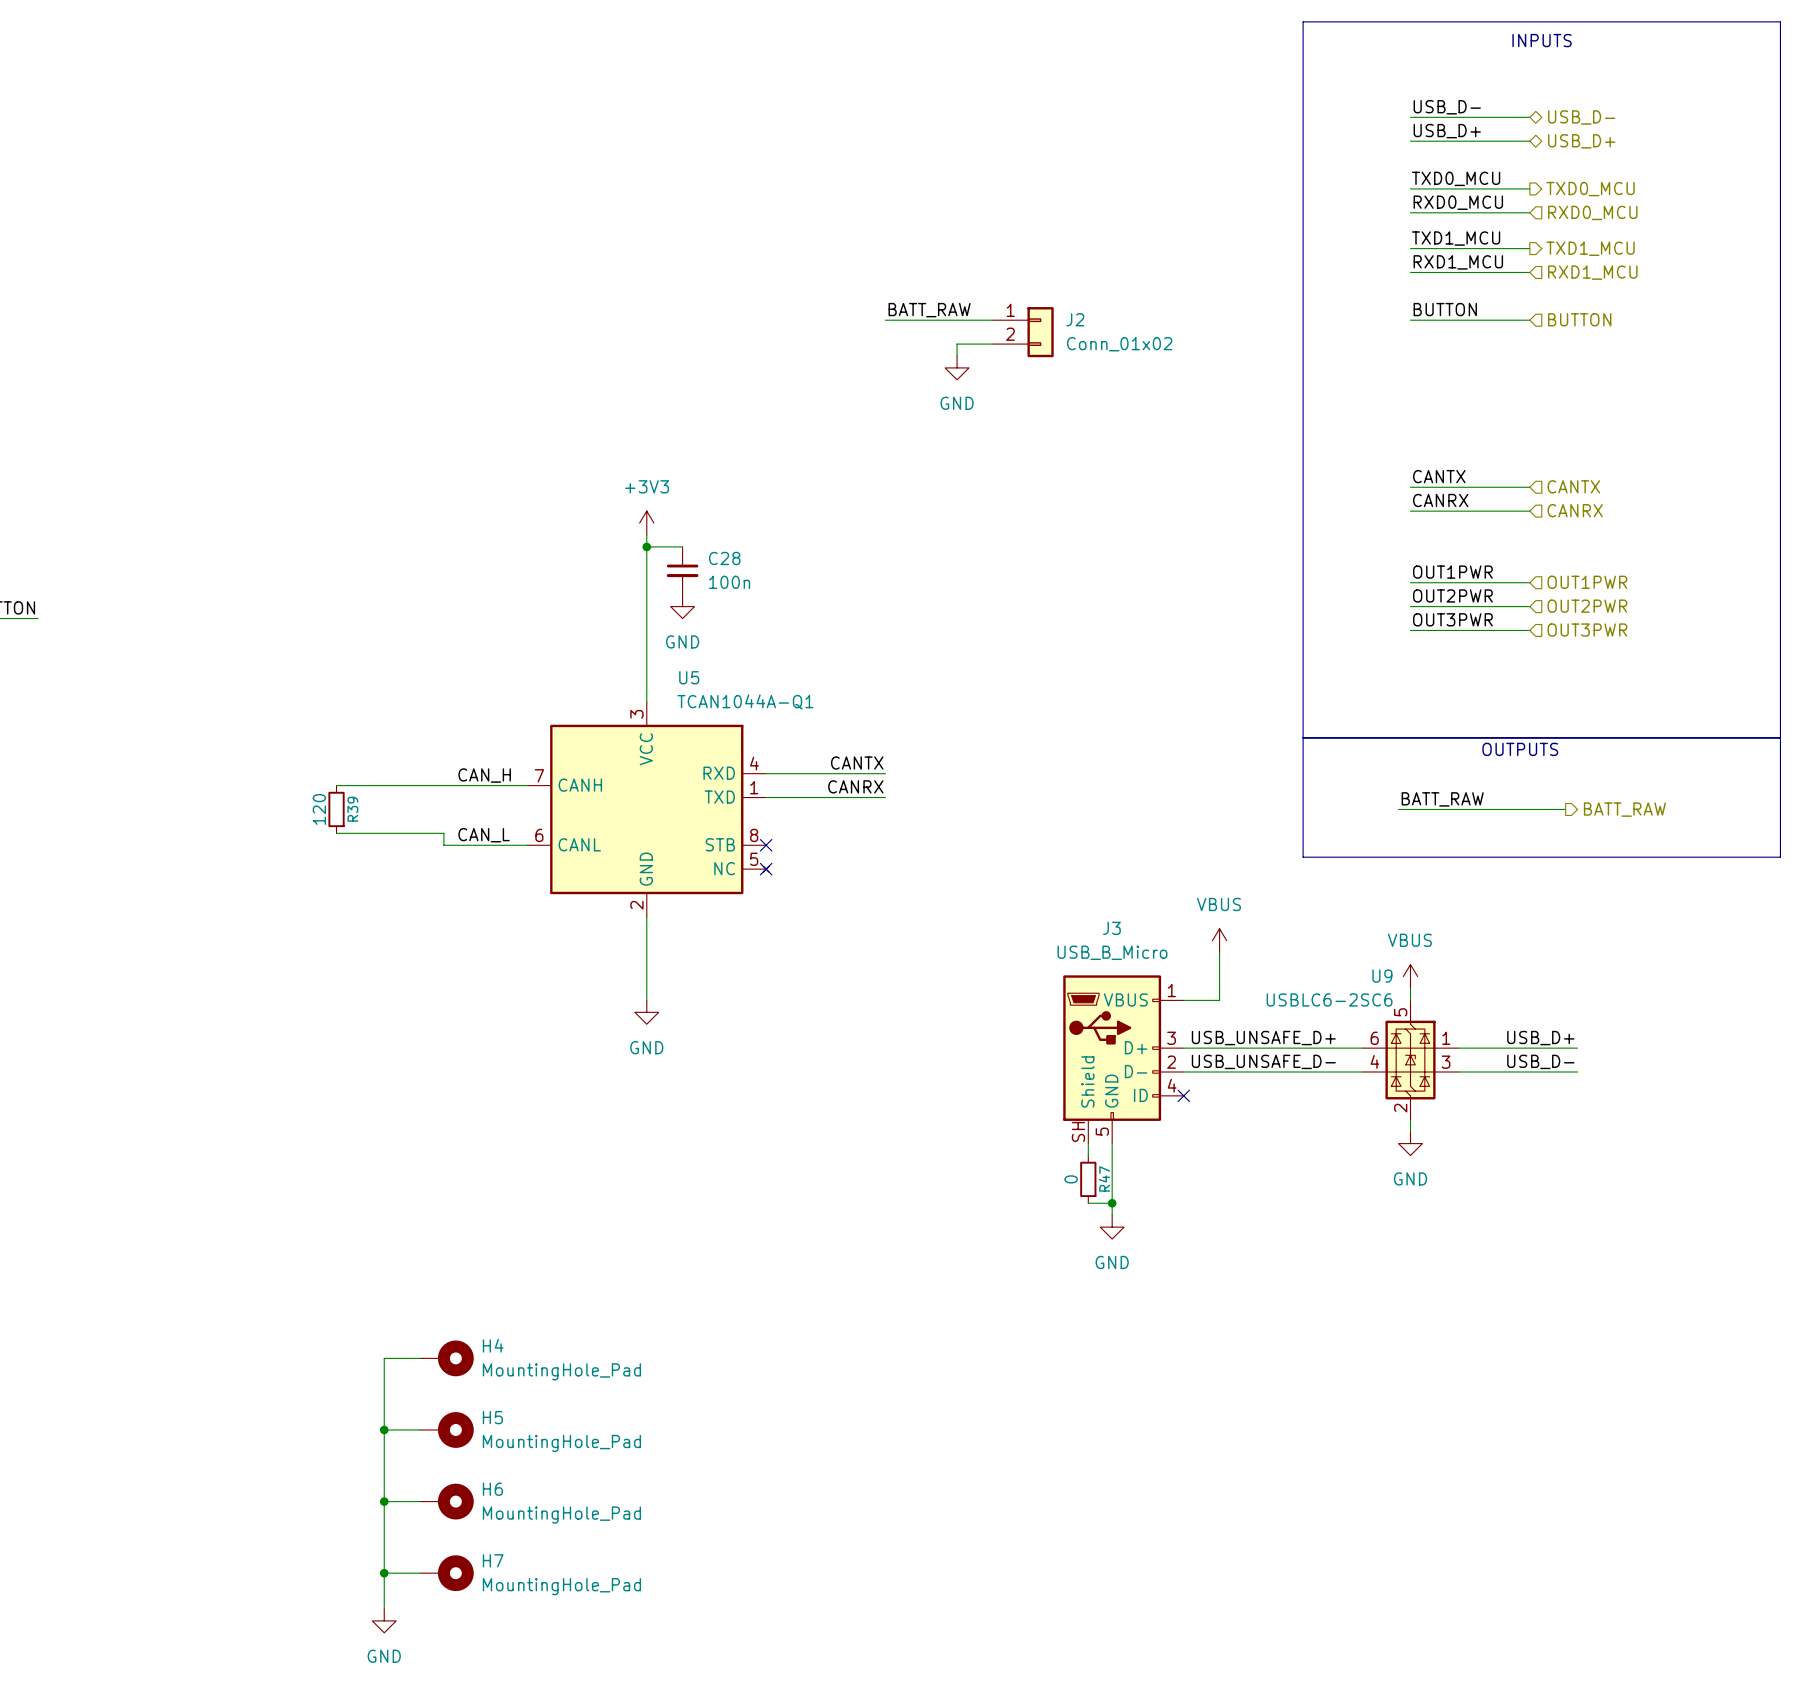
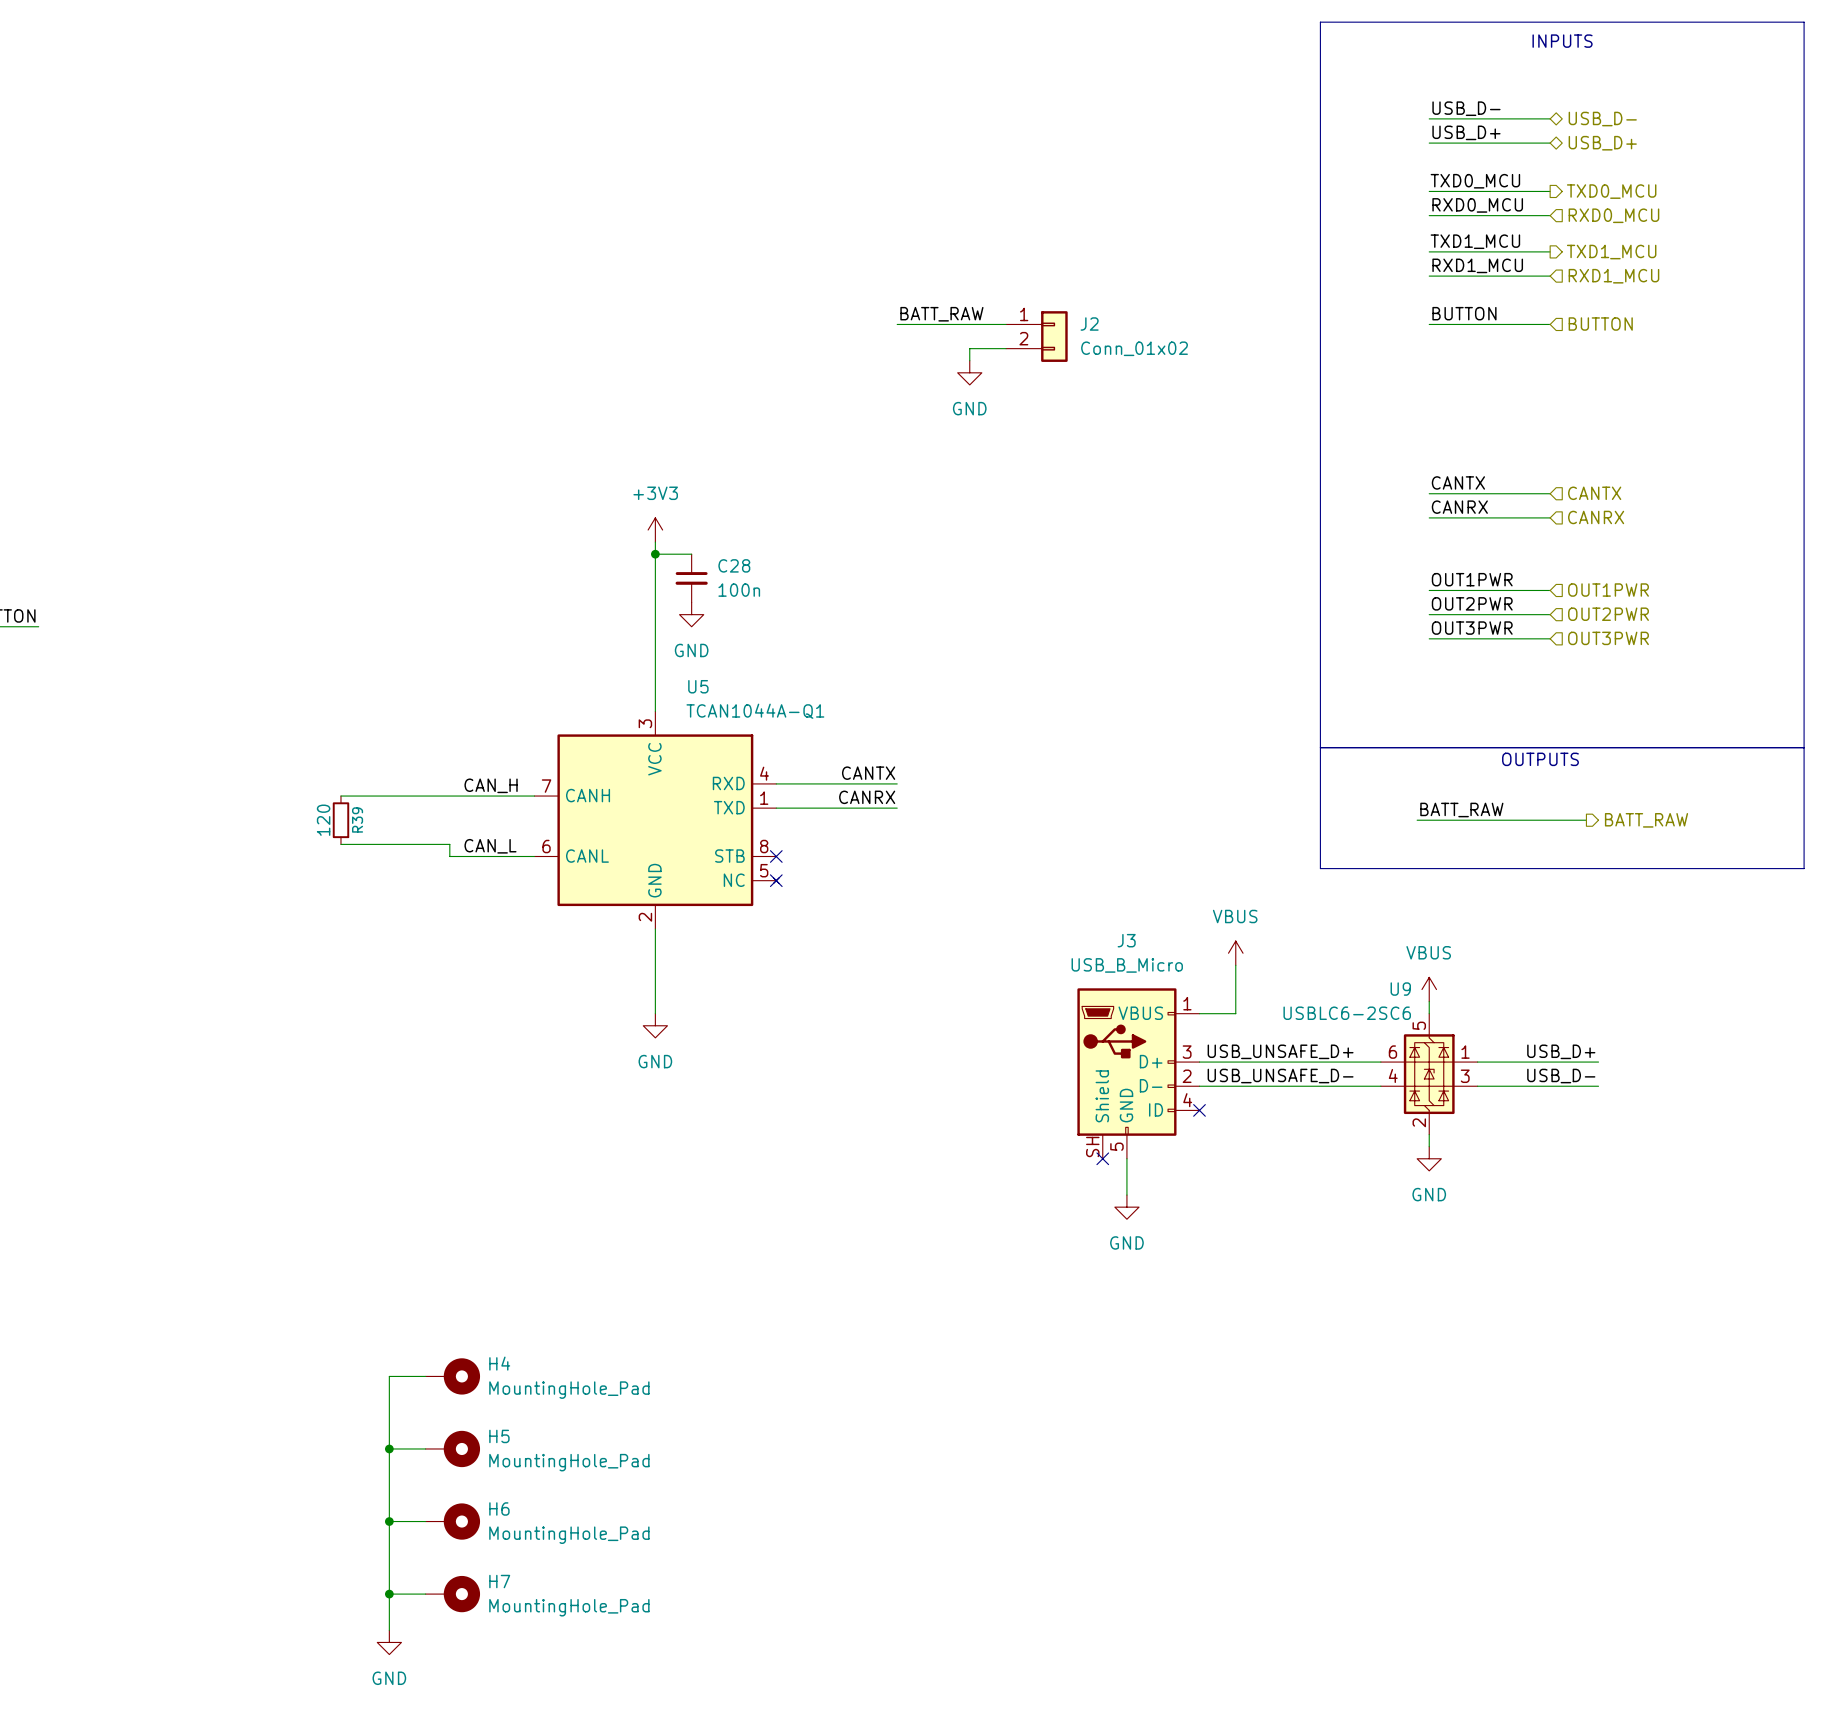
wire: (1088, 1143) (1088, 1155) -> none
no-connect mark: none -> (1102, 1158)
R47: 0 (1088, 1179) -> none
wire: (1112, 1179) (1112, 1215) -> none
wire: (1088, 1203) (1112, 1203) -> none
junction: (1112, 1203) -> none
power symbol position: GND (1112, 1227) -> GND (1126, 1207)

